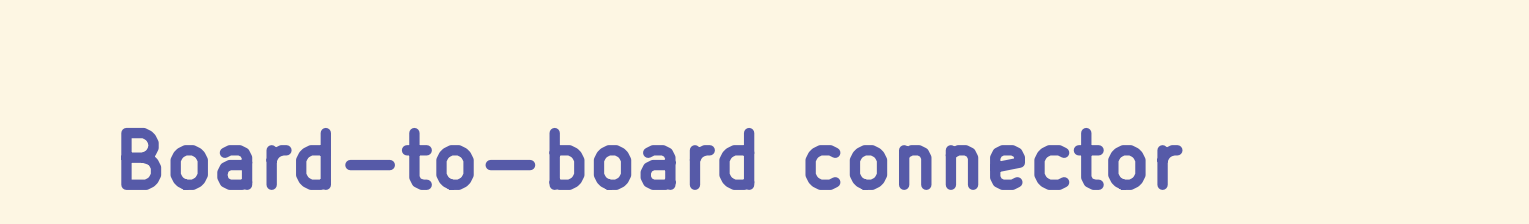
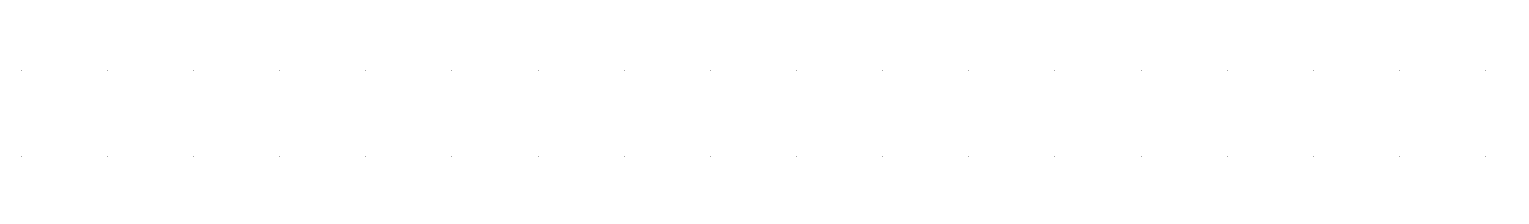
text: Board-to-board connector (651, 158) -> none

